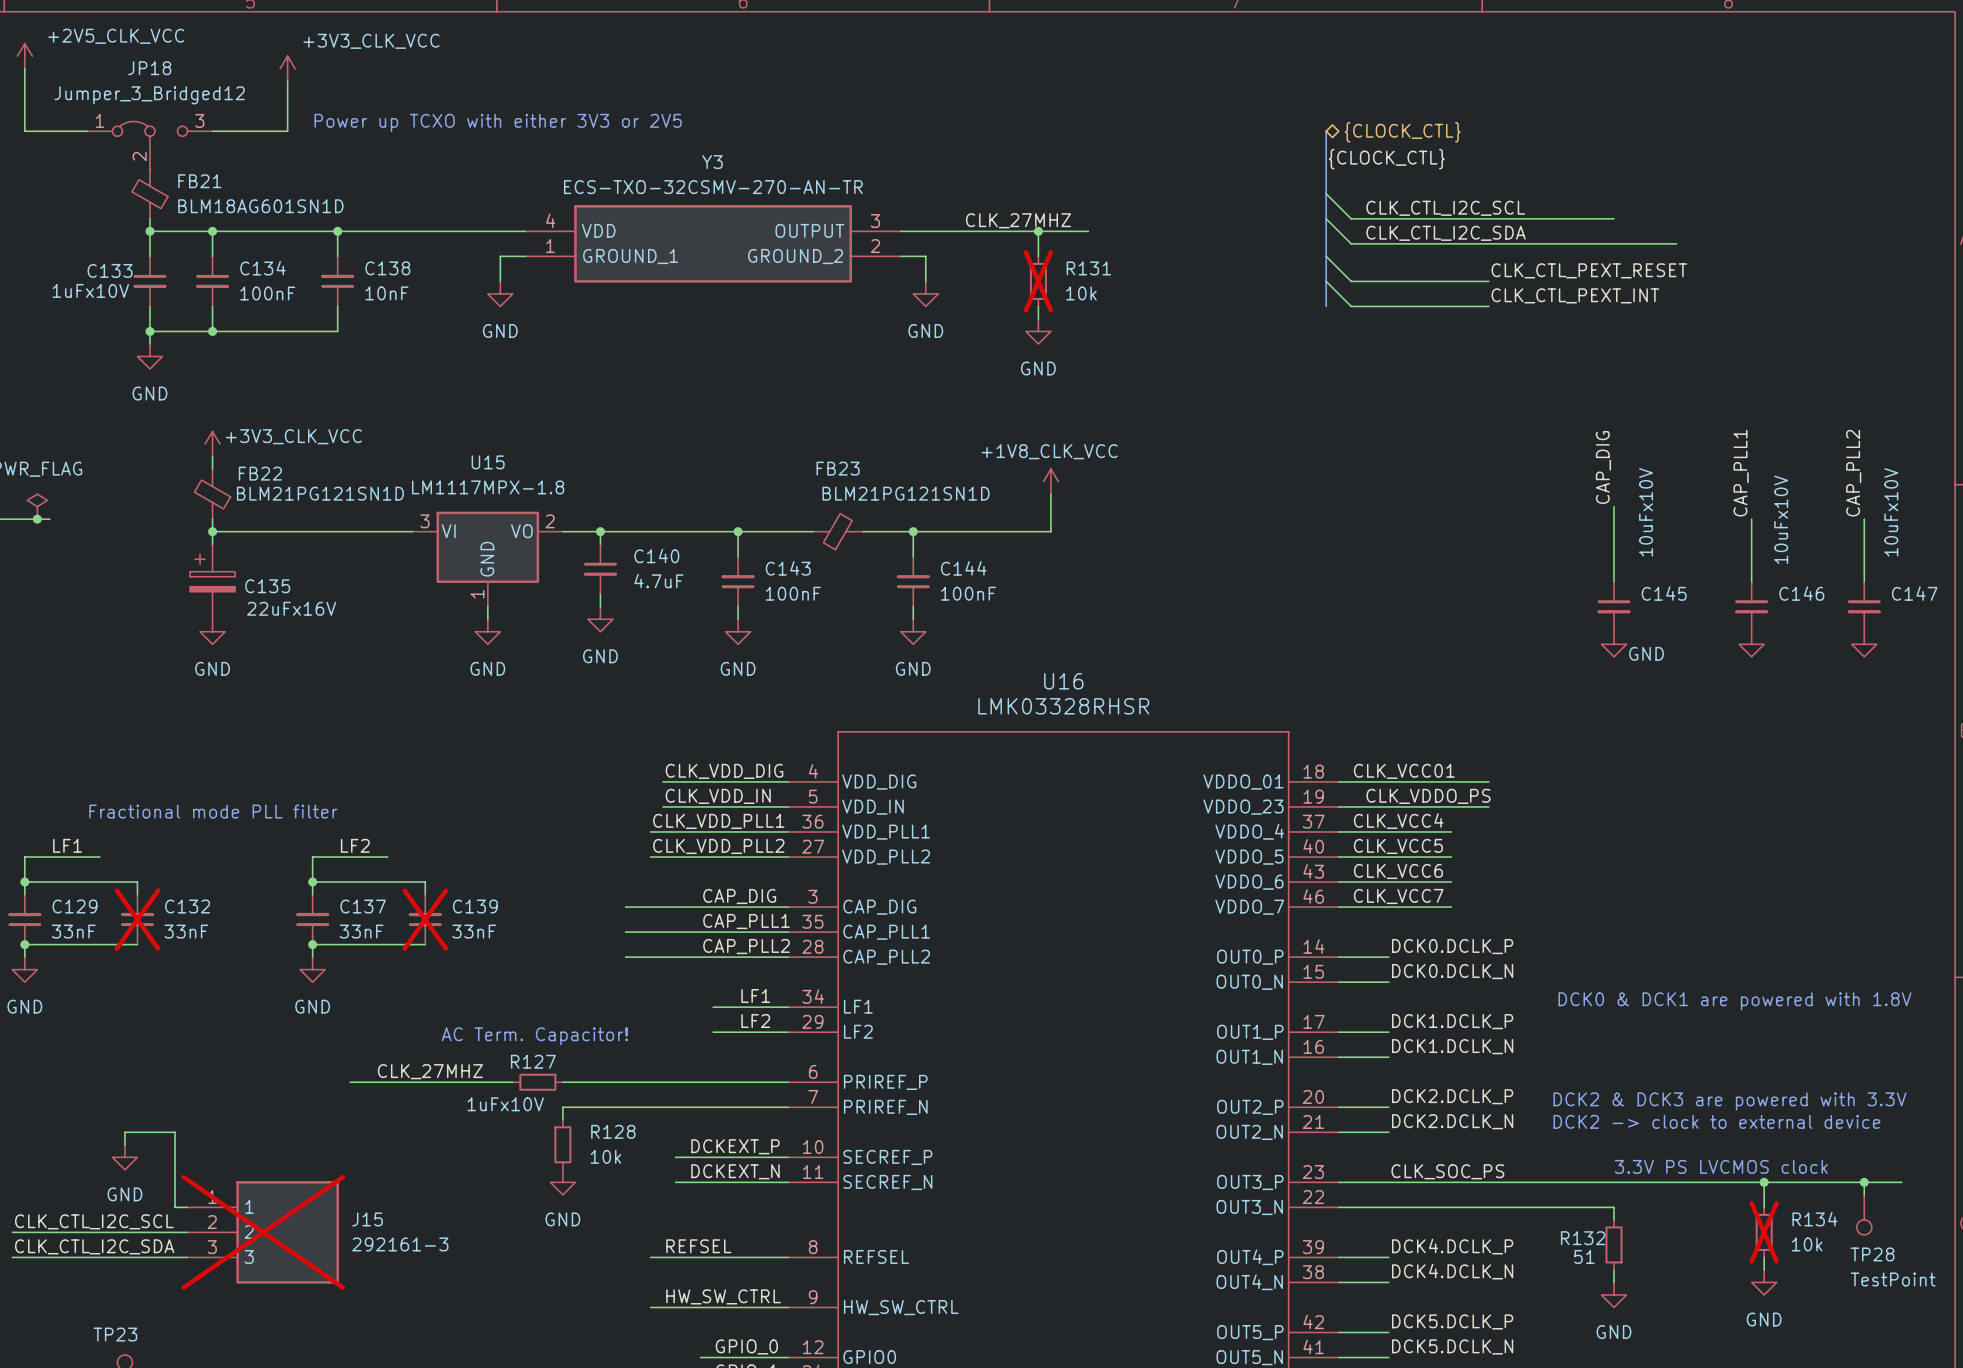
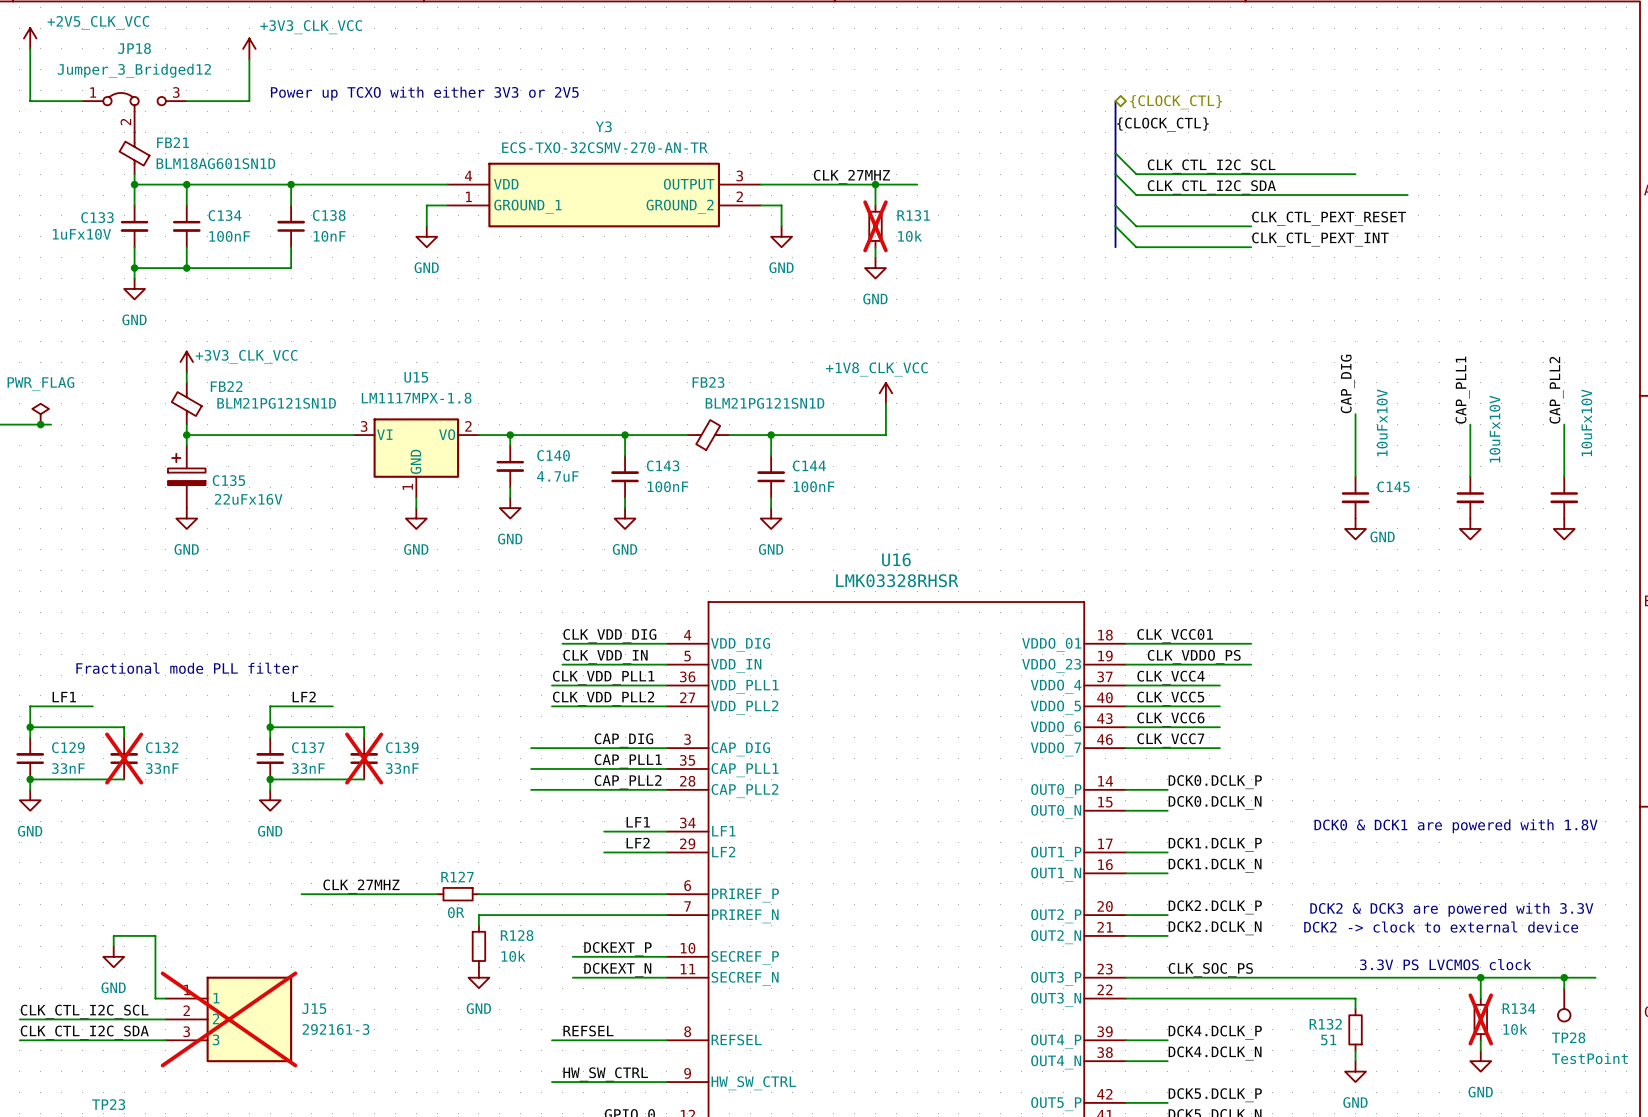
C146 name: C146 (1801, 593) -> none
C147 name: C147 (1914, 593) -> none
text: AC Term. Capacitor! (534, 1036) -> none
R127 value: 1uFx10V (505, 1104) -> 0R (456, 912)

